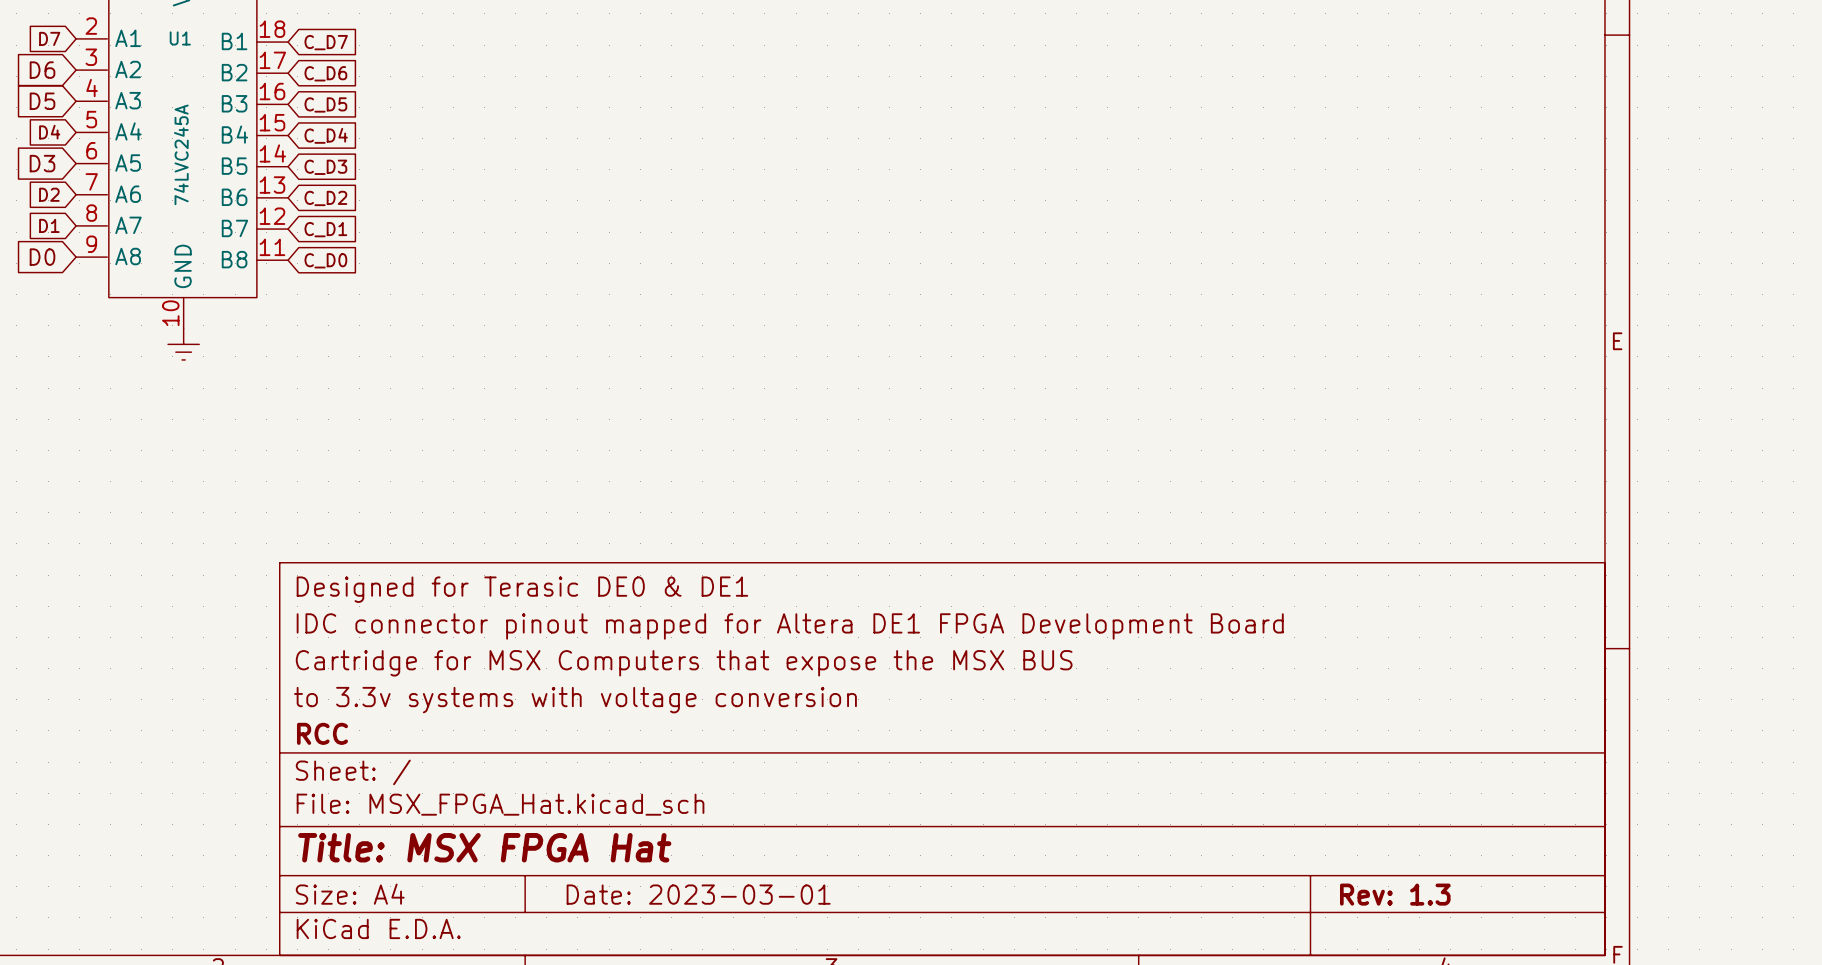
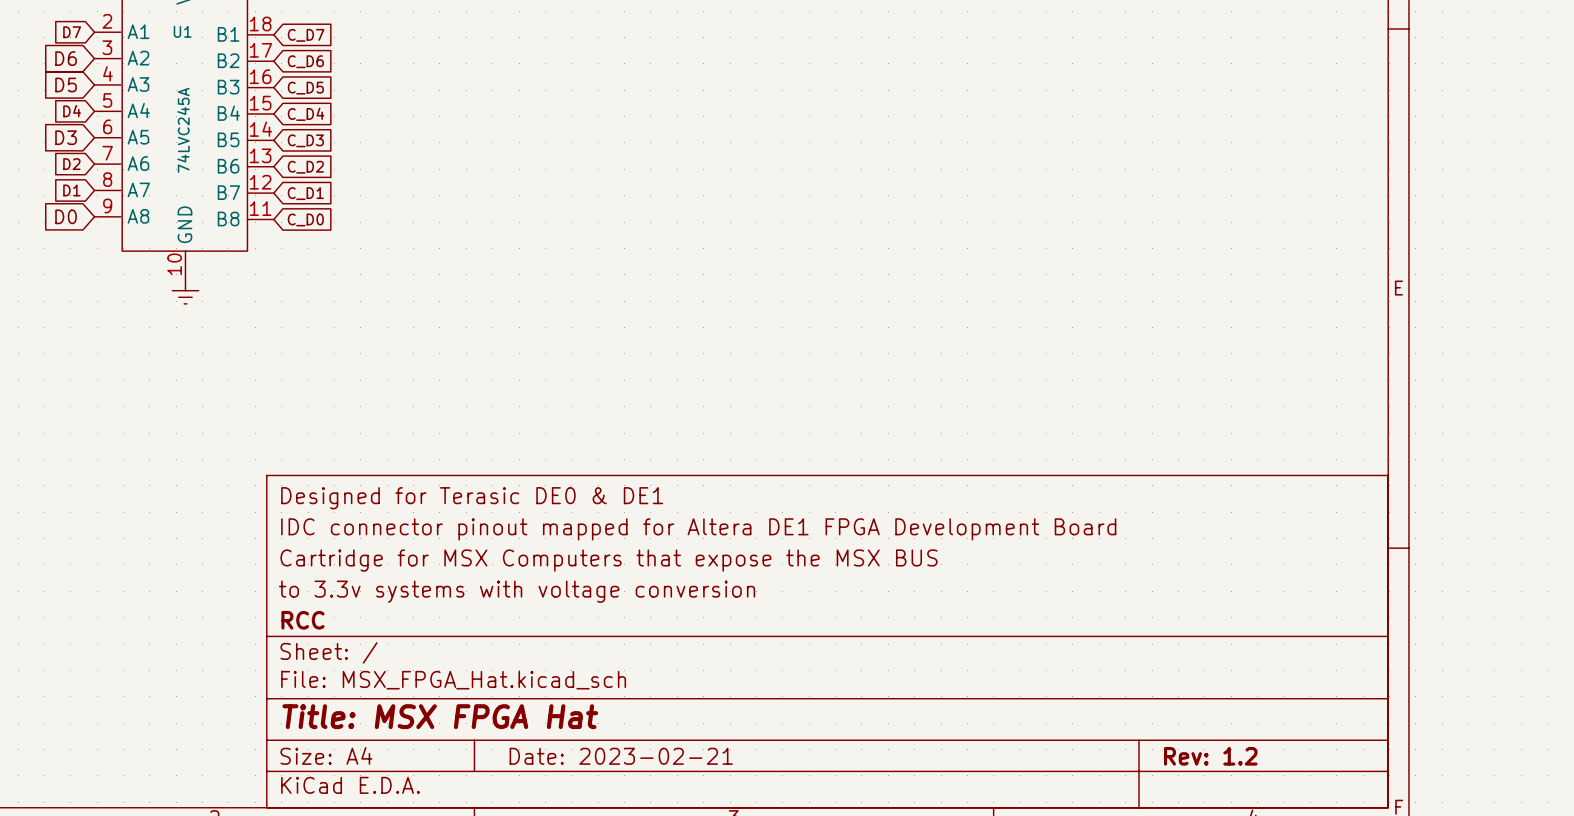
title block: Date: 2023-03-01 (698, 894) -> Date: 2023-02-21 (621, 756)
title block: Rev: 1.3 (1395, 894) -> Rev: 1.2 (1210, 756)

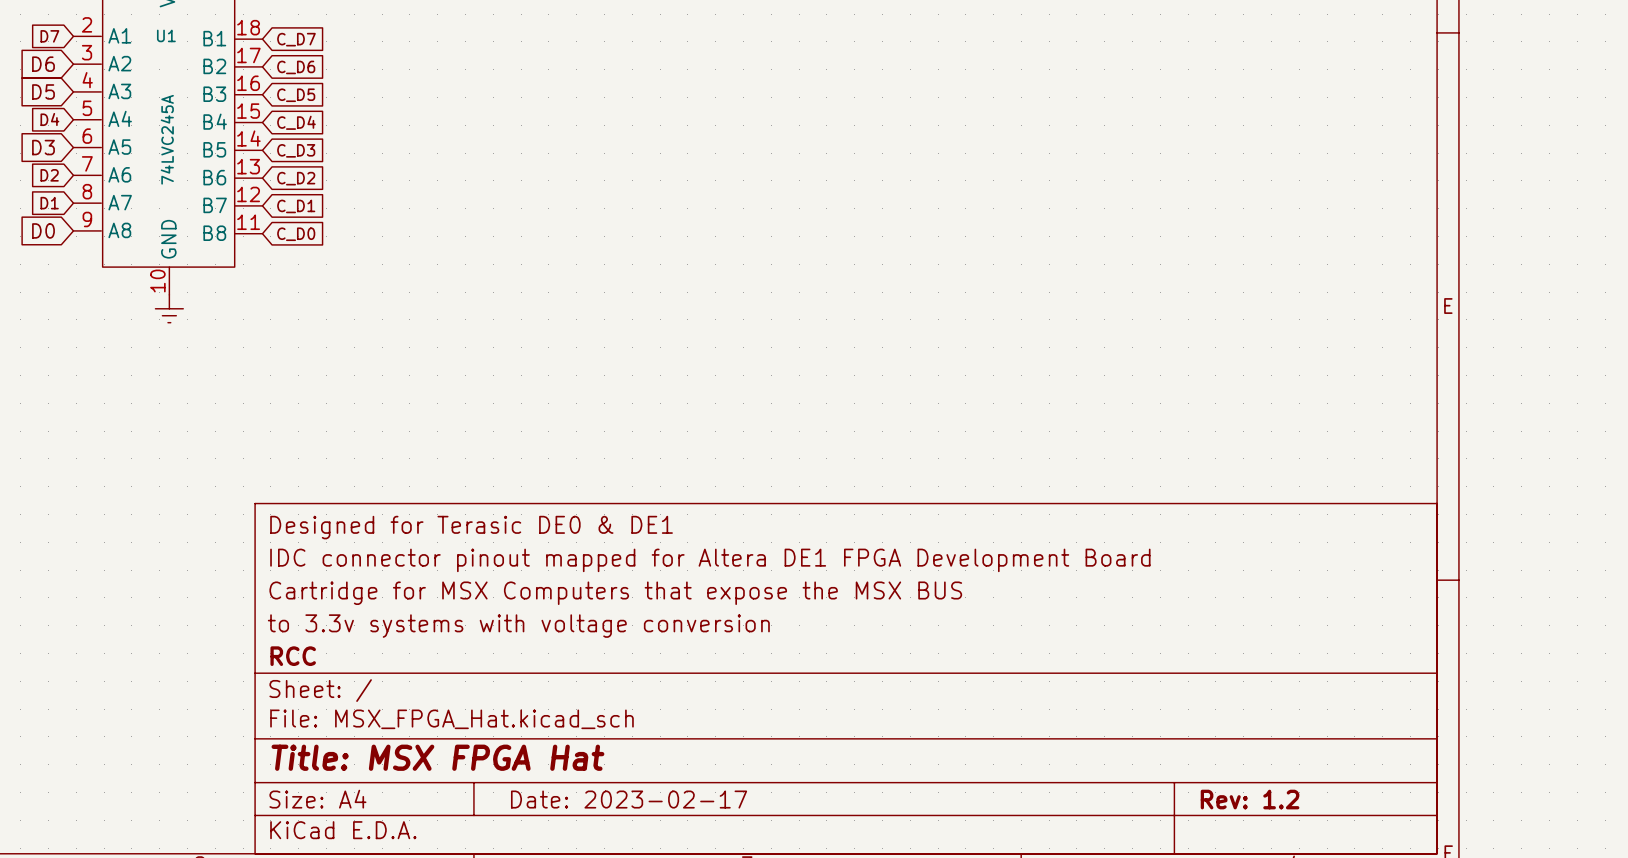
title block: Date: 2023-02-21 (621, 756) -> Date: 2023-02-17 (629, 799)

